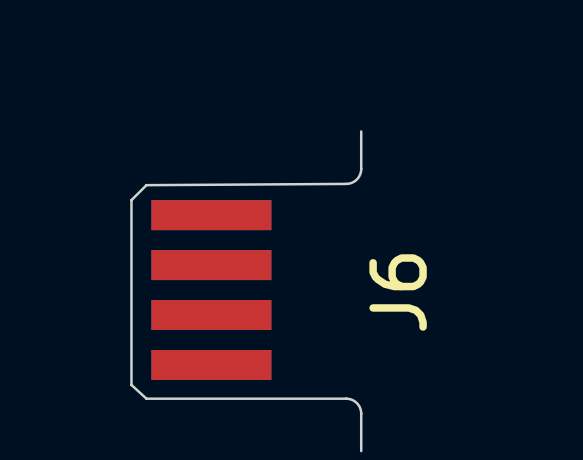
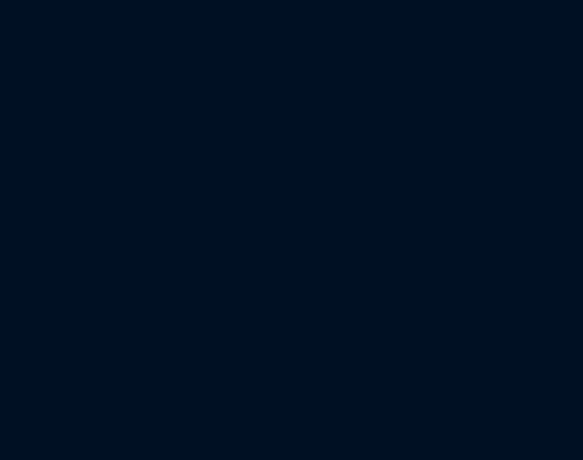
J6: (246, 291) -> none

